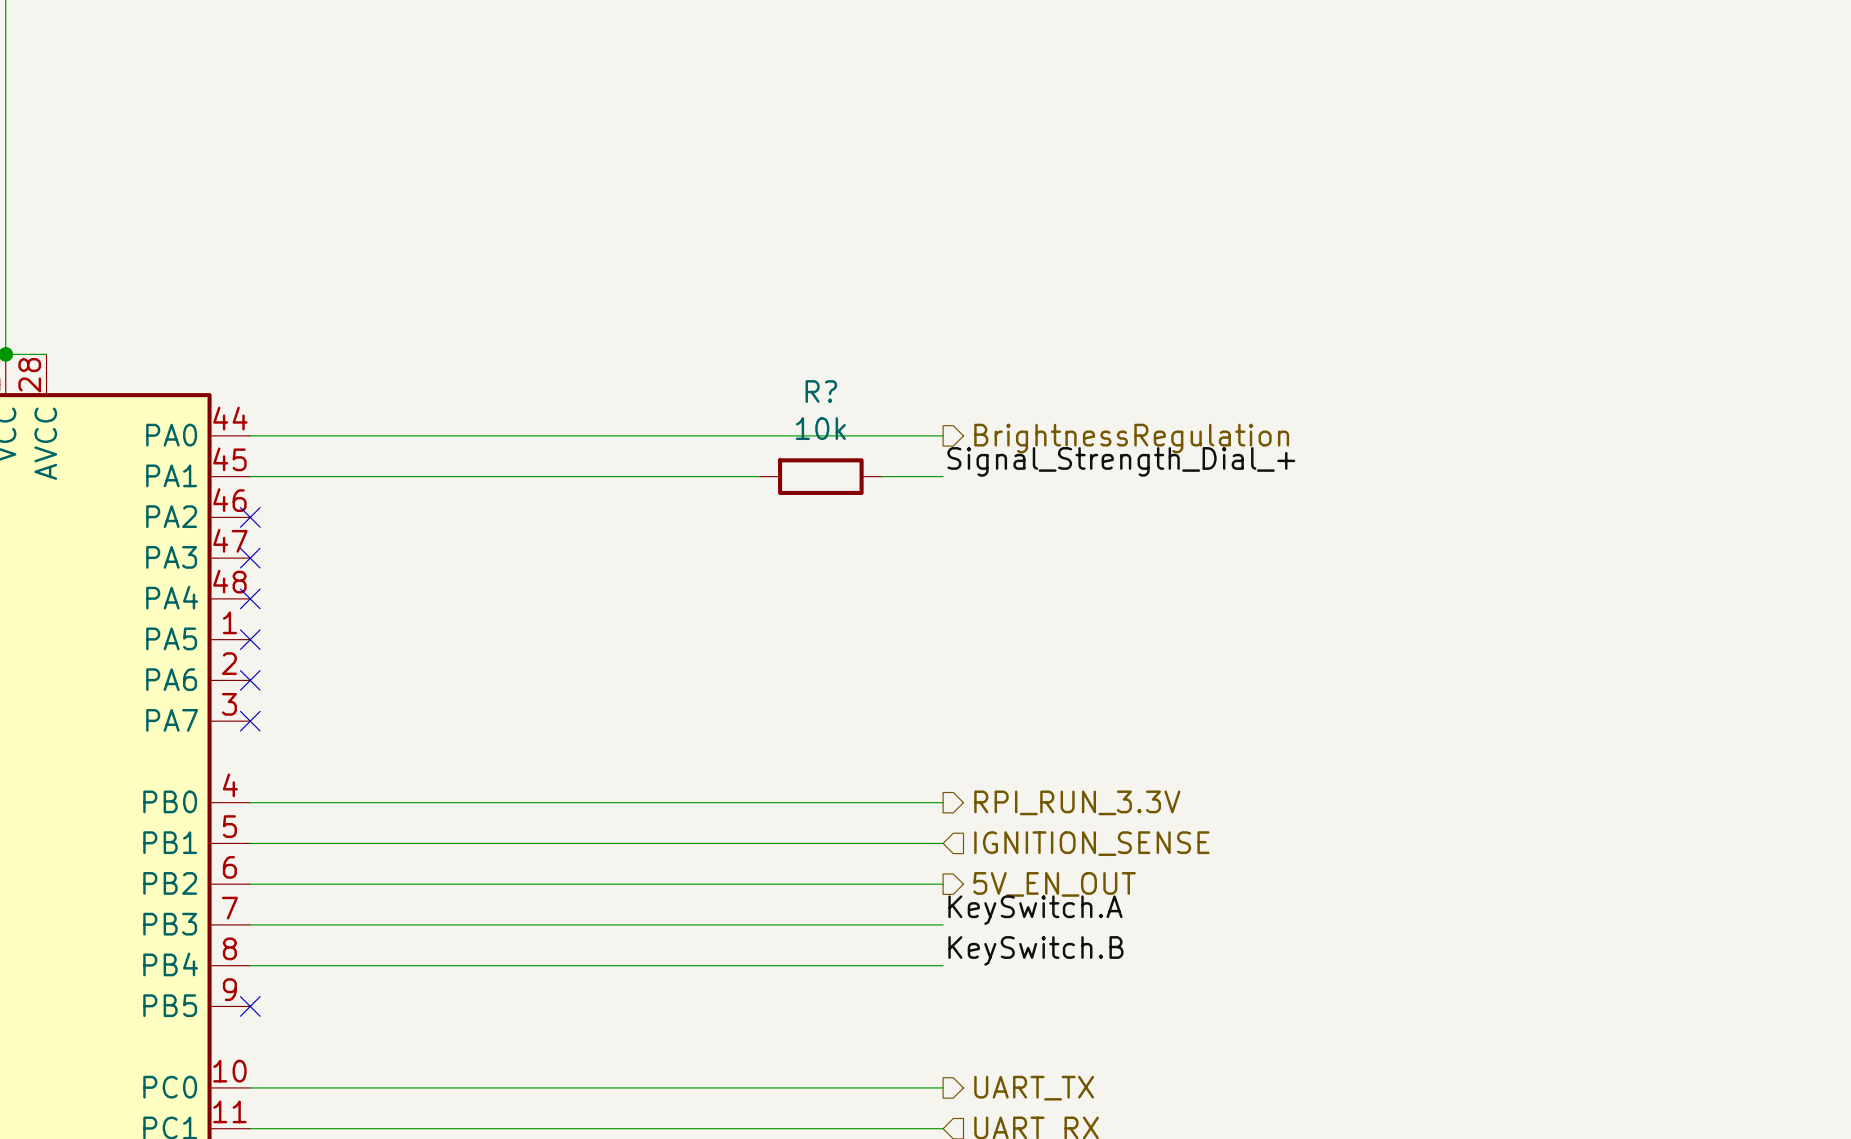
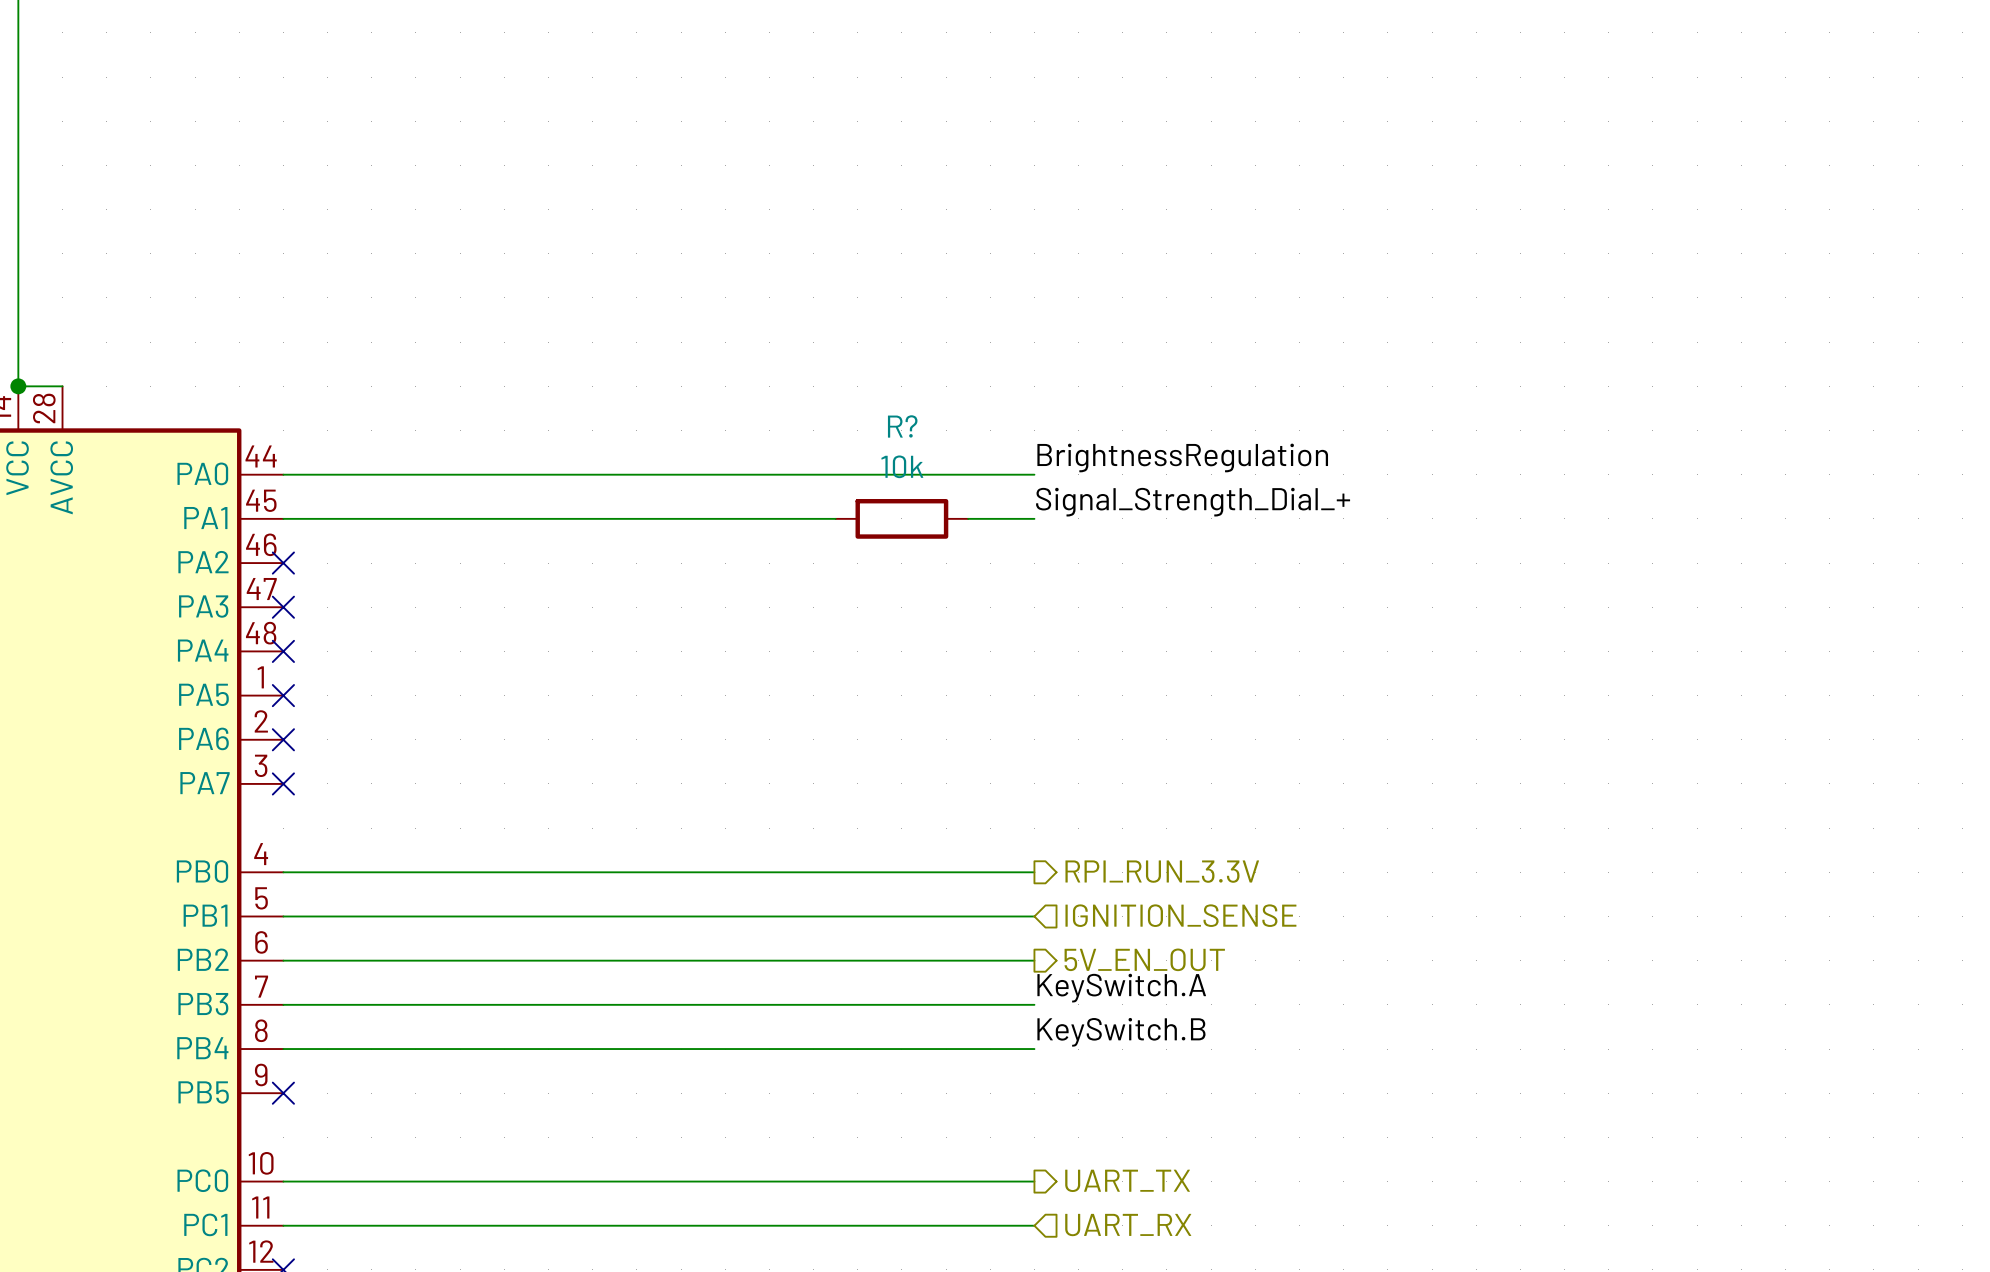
label: none -> BrightnessRegulation (1182, 457)
hierarchical label: BrightnessRegulation (1131, 438) -> none

